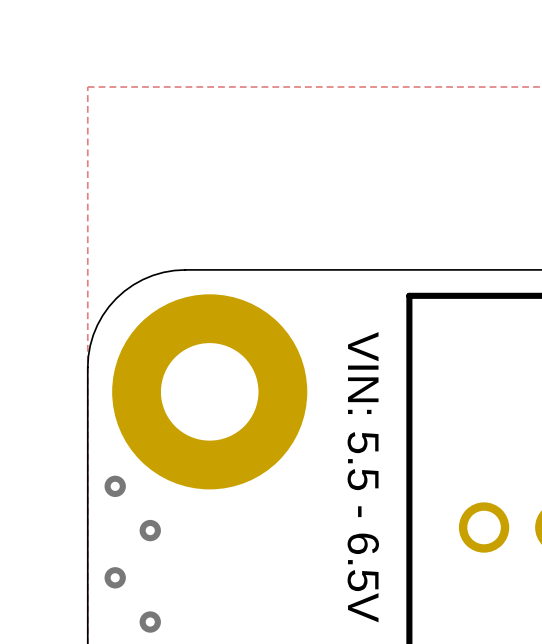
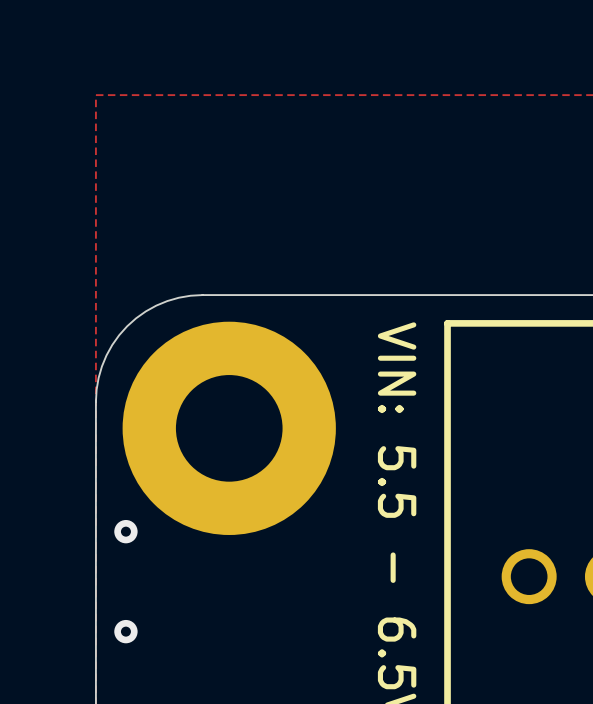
via: (150, 530) -> none
via: (150, 622) -> none

